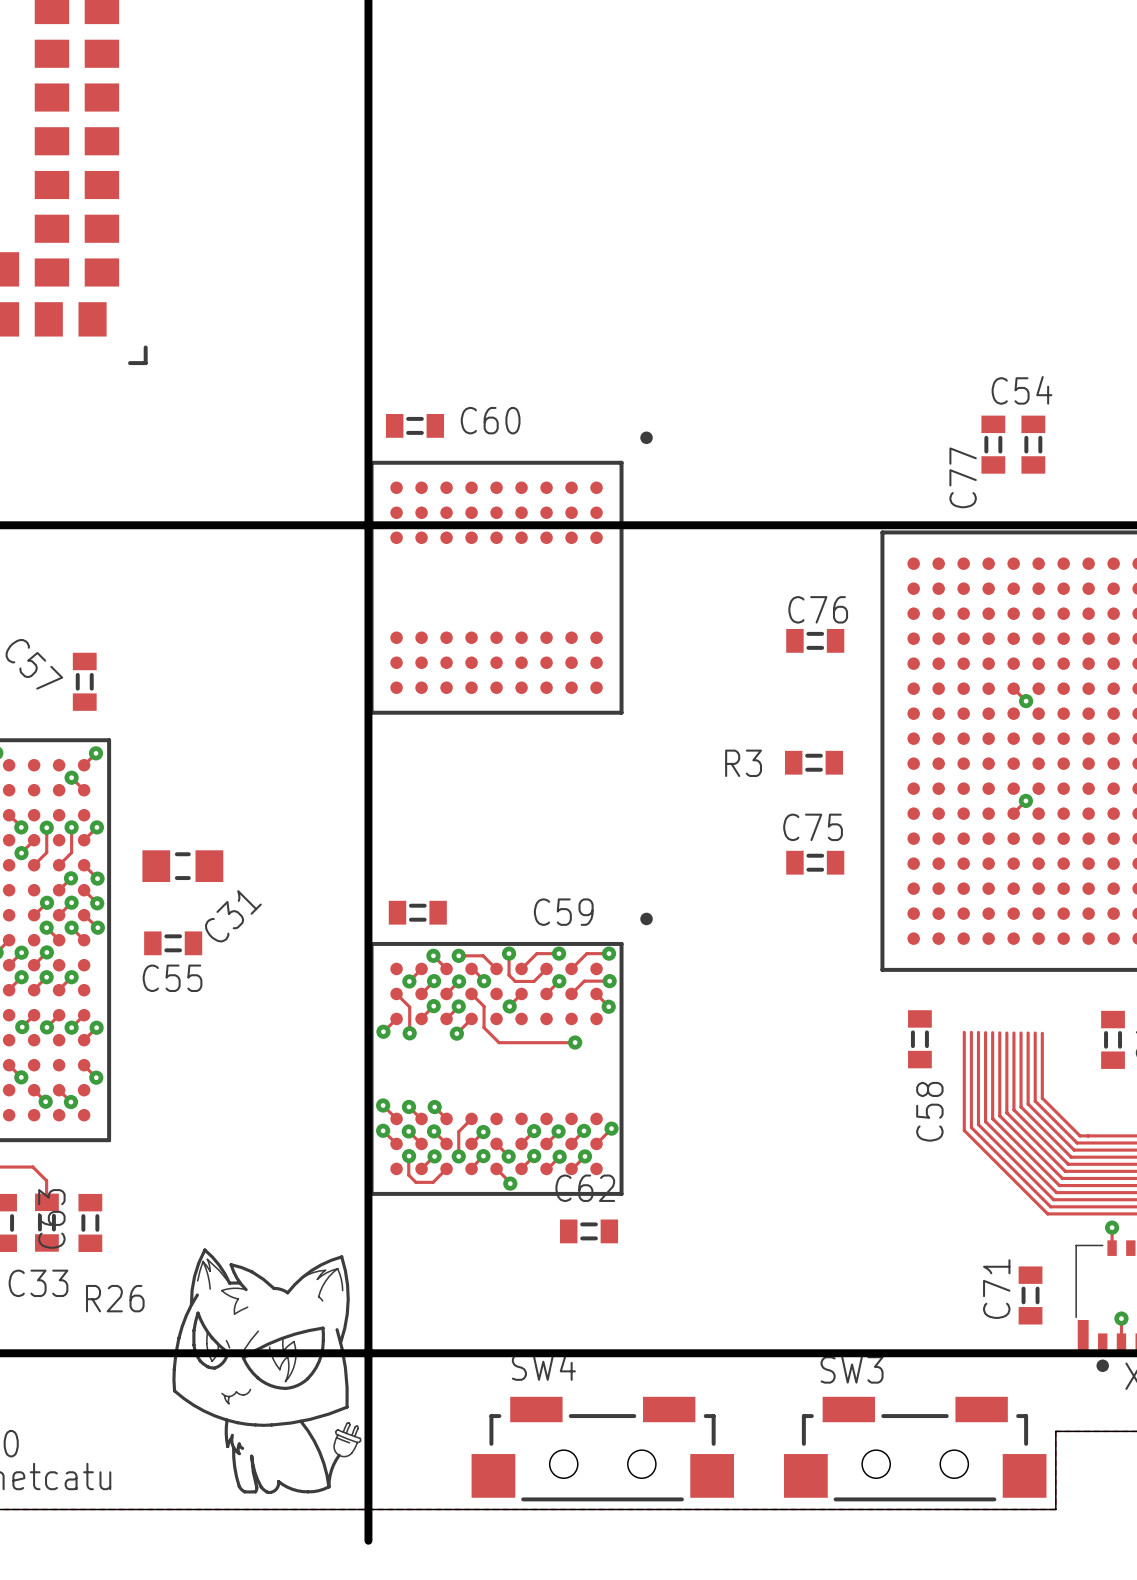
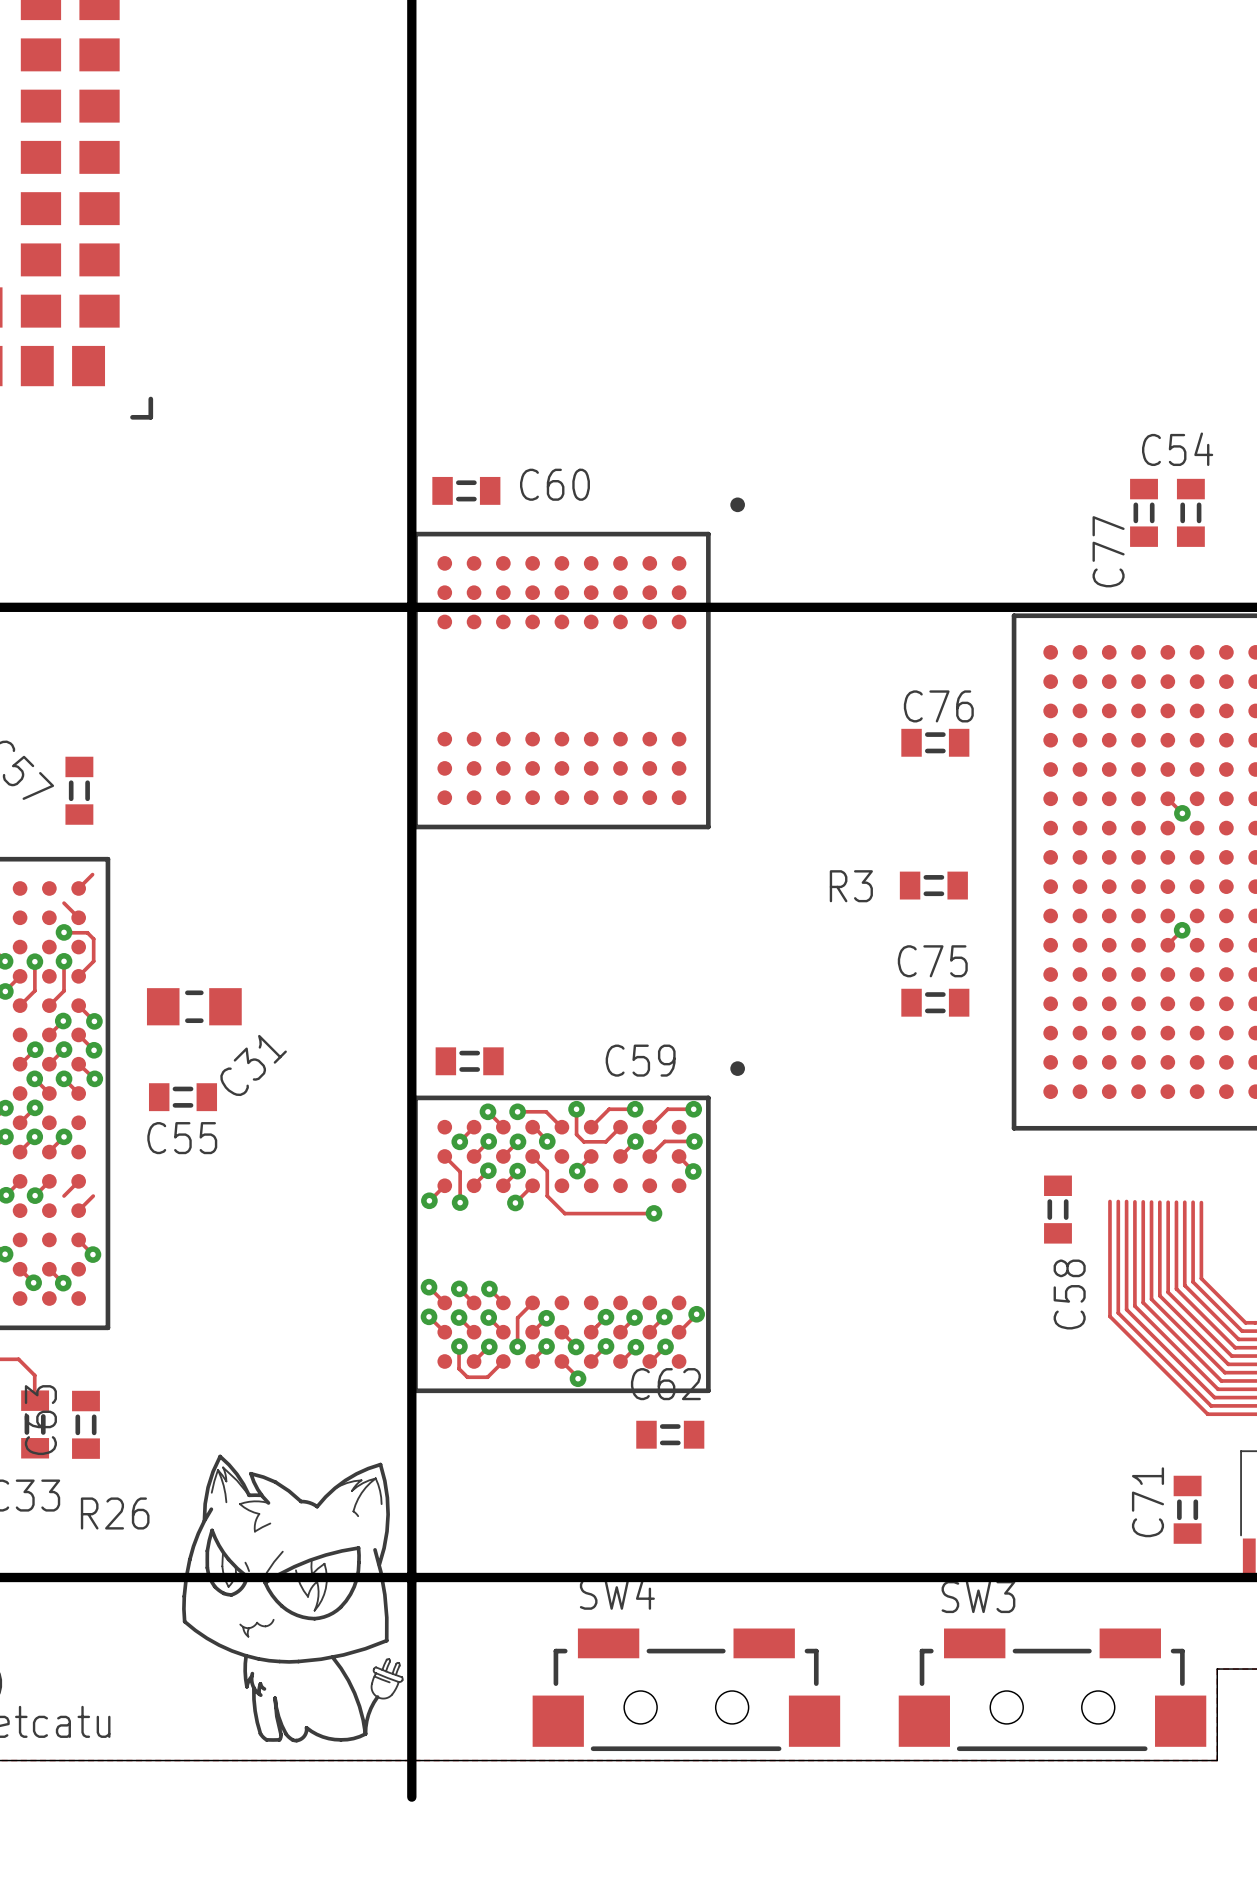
via: (95, 753) -> none
via: (71, 777) -> none
via: none -> (64, 932)
track: none -> (64, 932) (87, 932) (93, 939) (93, 960)
via: (96, 827) -> none
via: (71, 1027) -> none
via: (96, 1027) -> none

